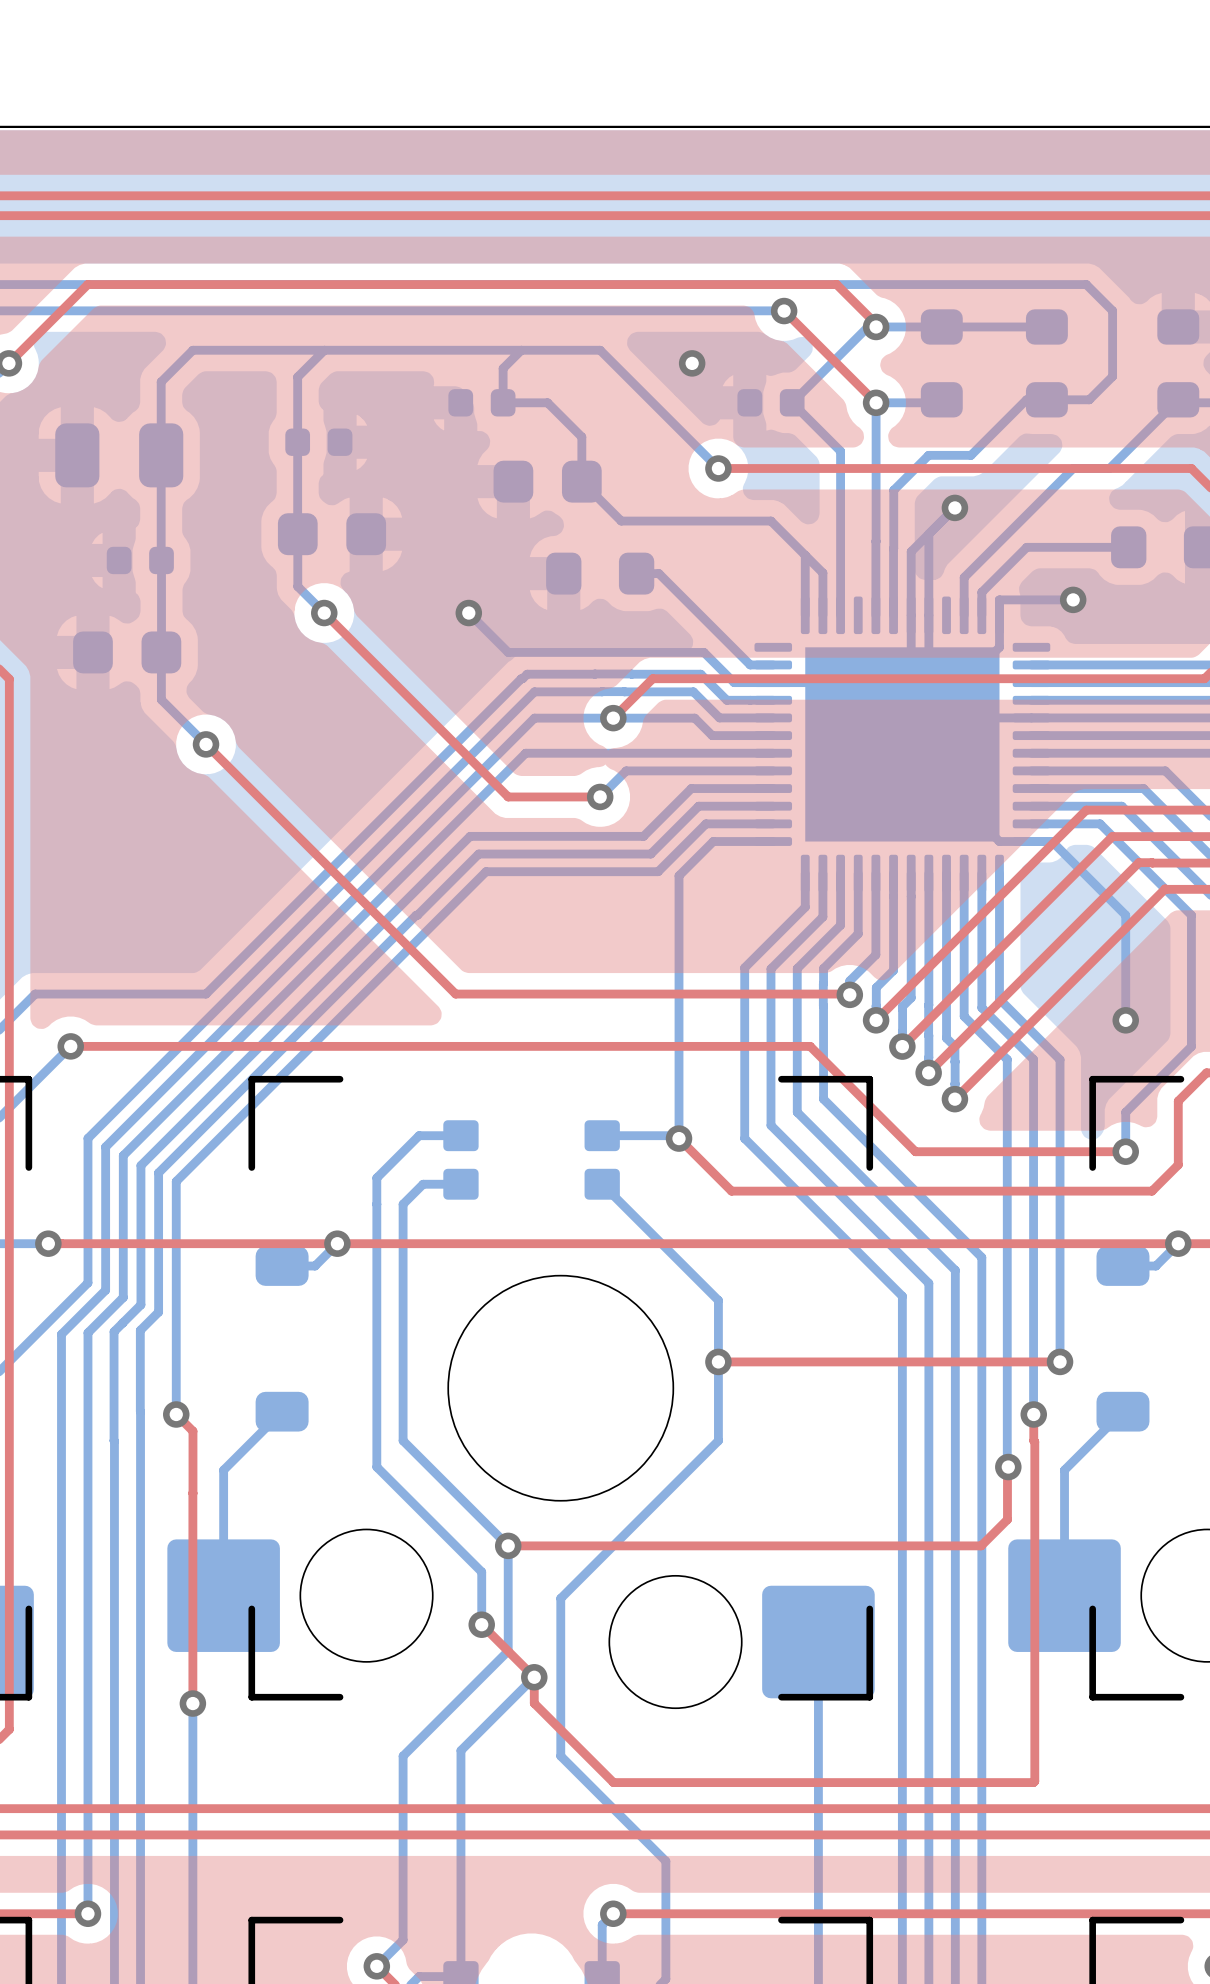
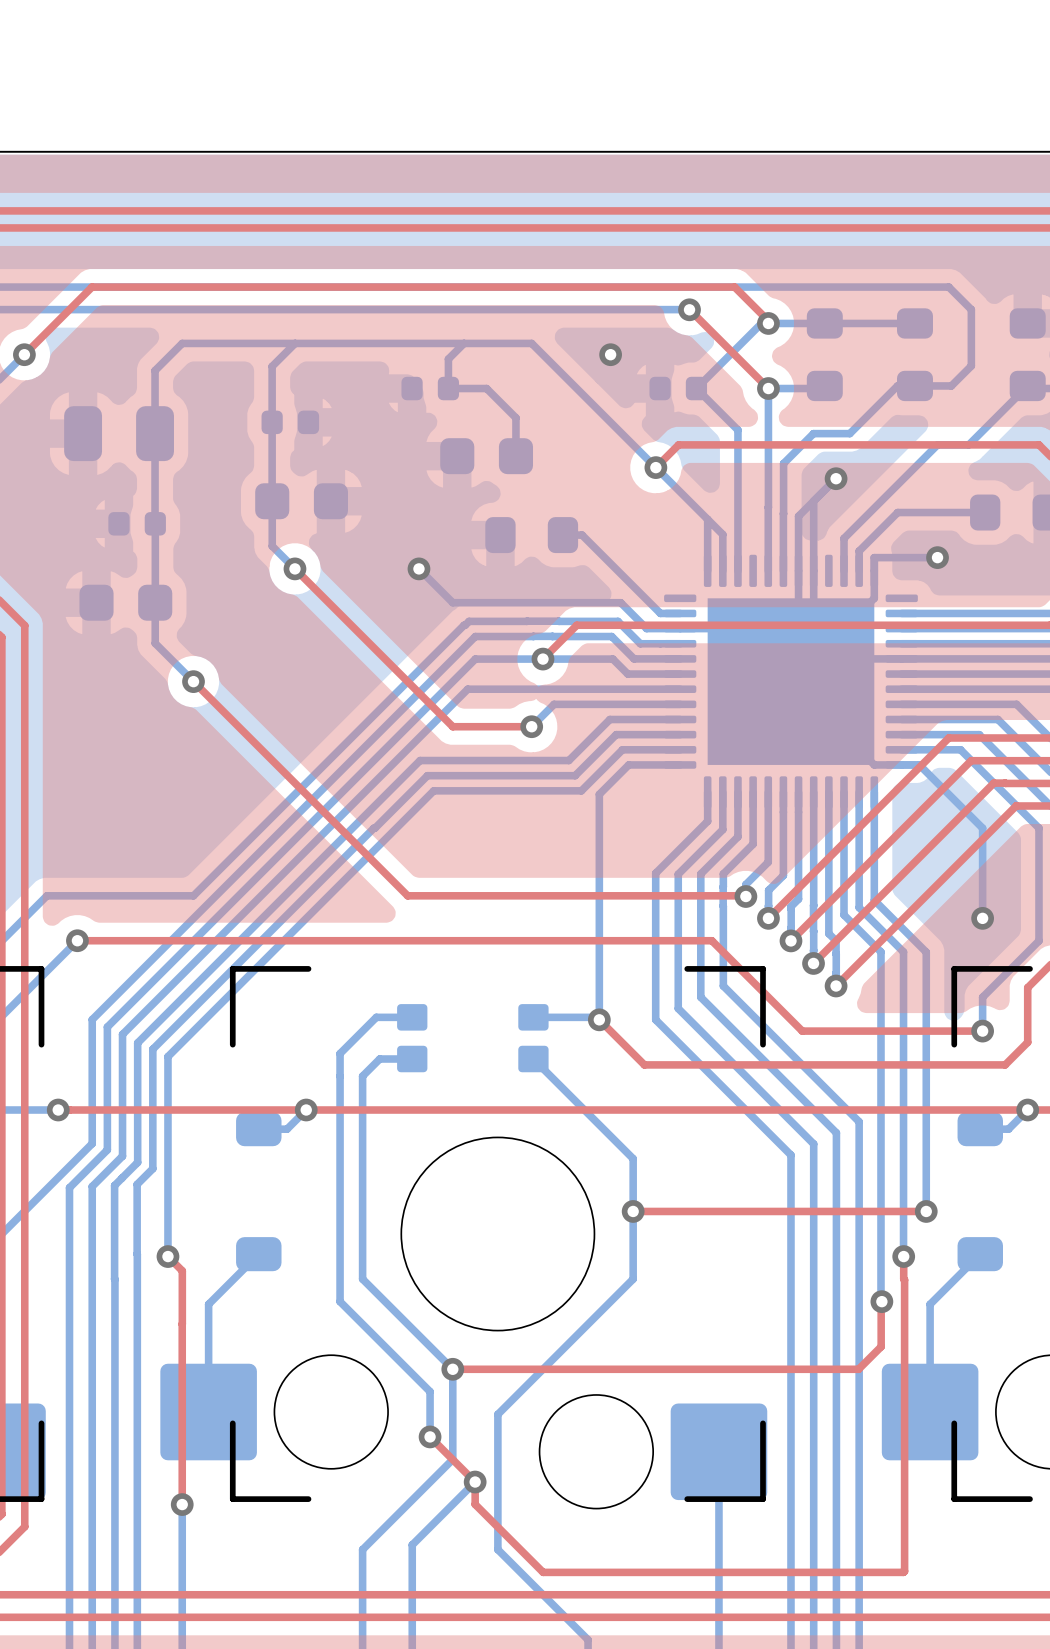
top track: (718, 468) (771, 468) -> (655, 467) (678, 444)
via position: (718, 468) -> (655, 467)
bottom track: (581, 481) (621, 521) (770, 521) -> (633, 444) (678, 489)

